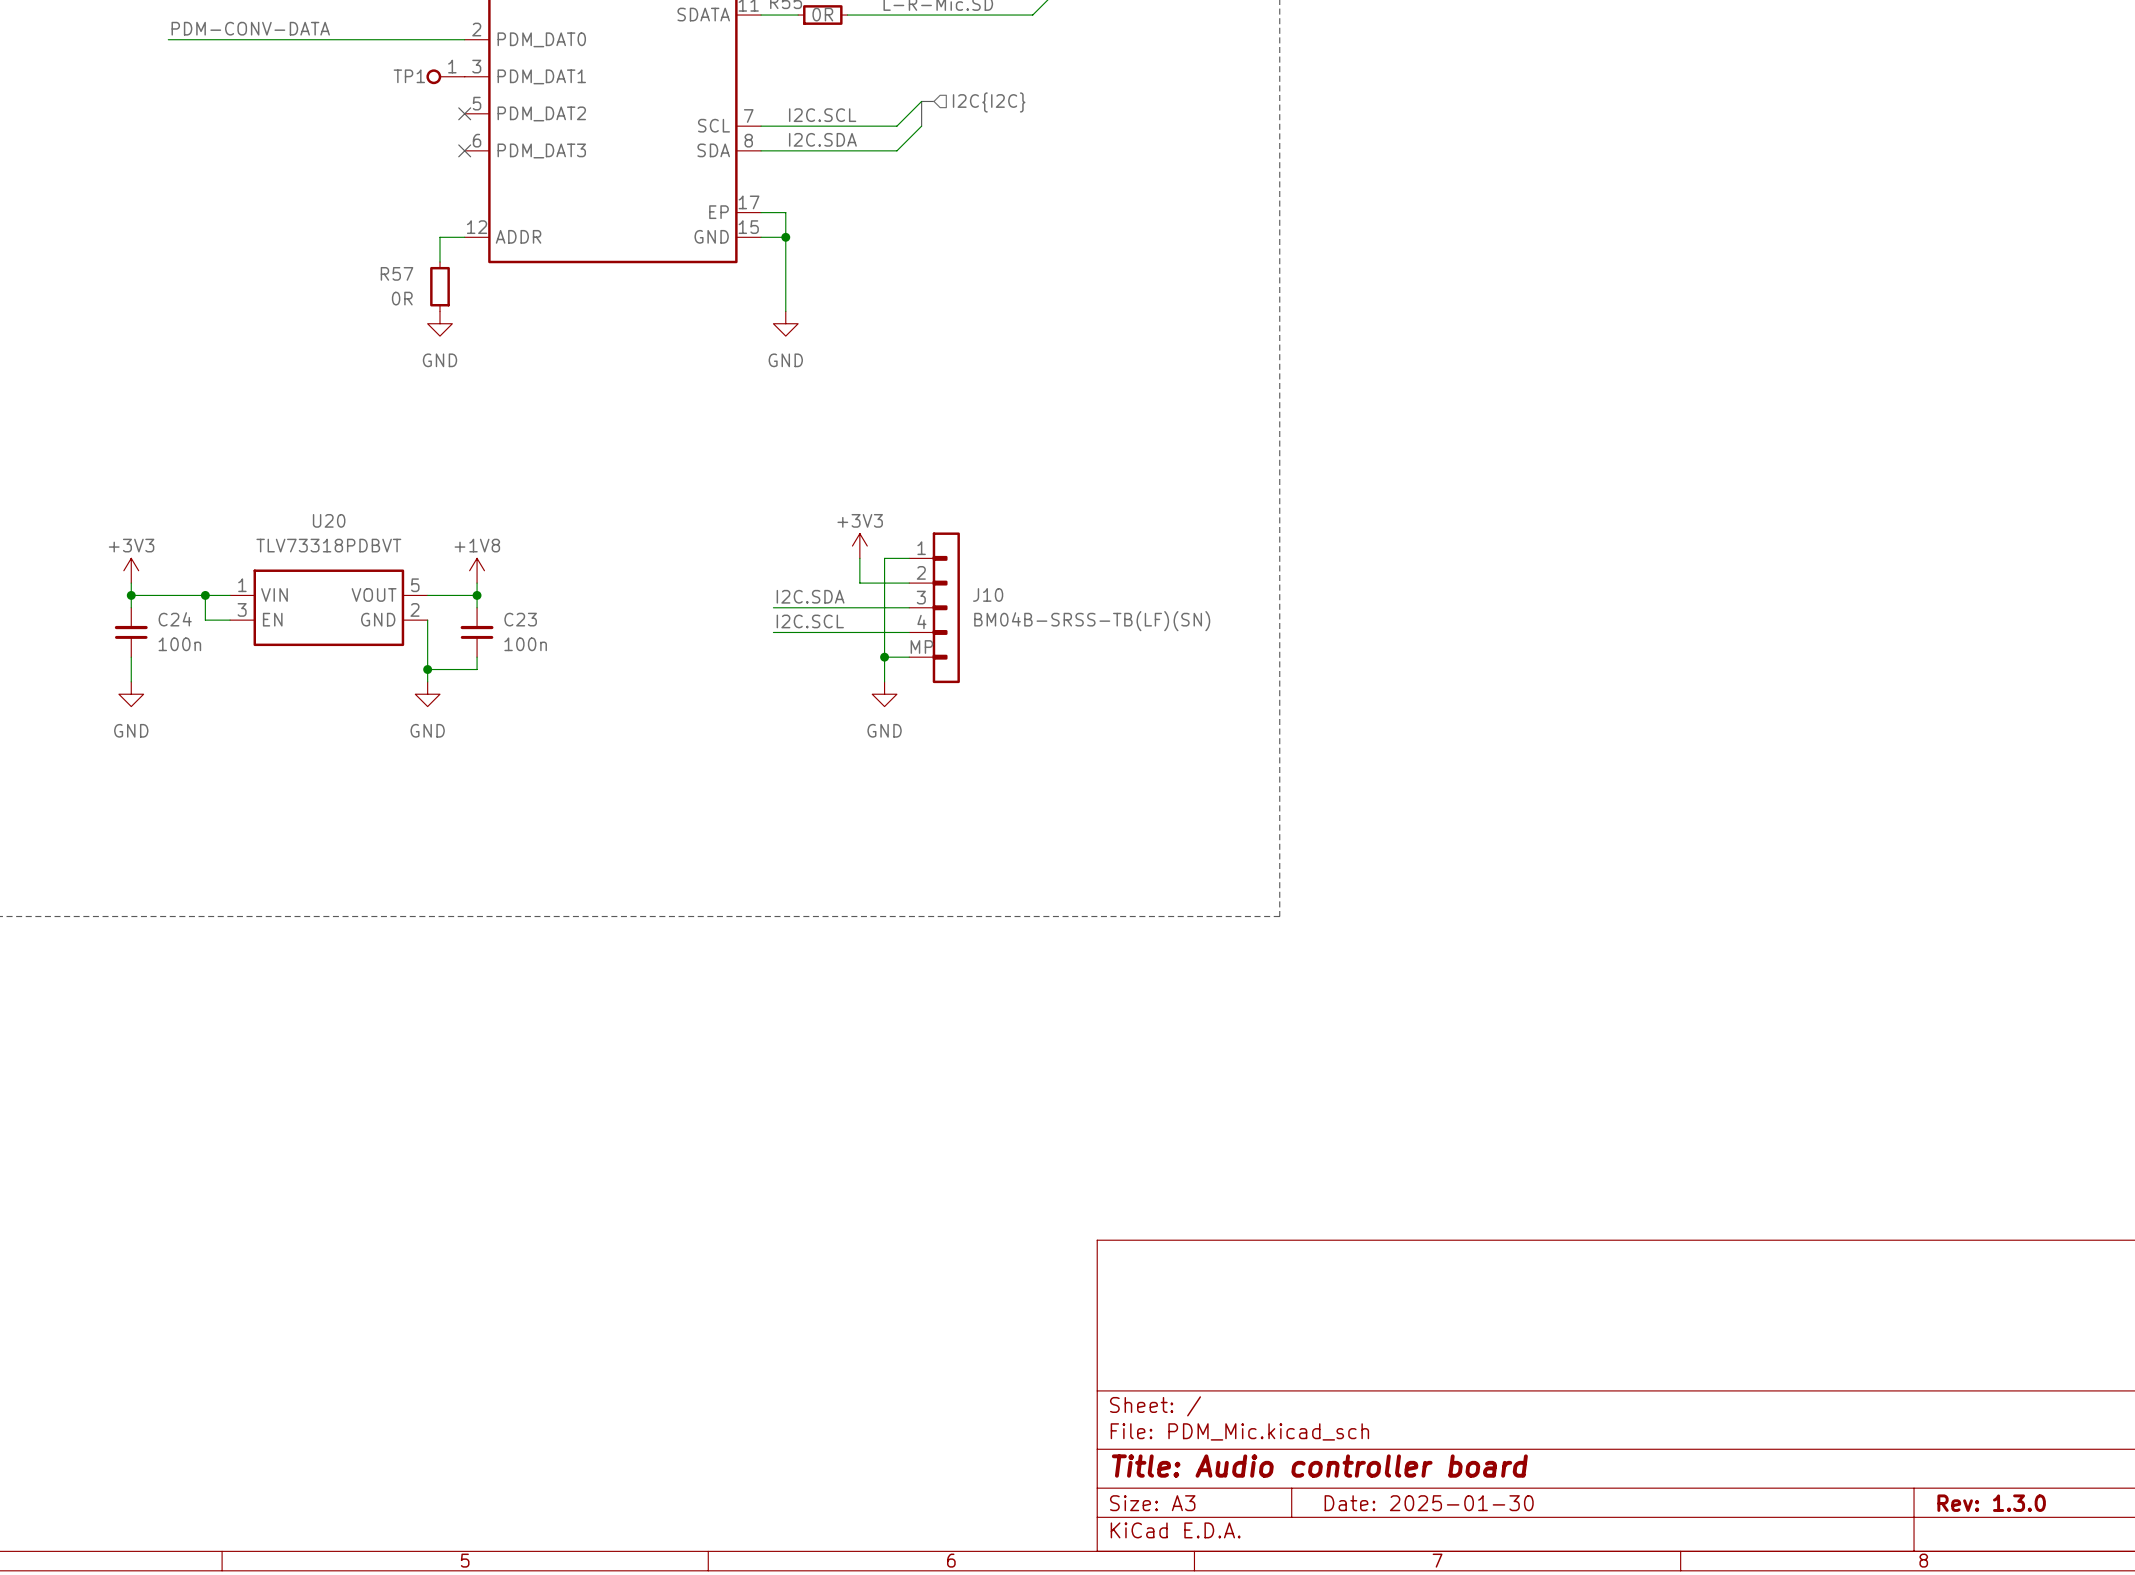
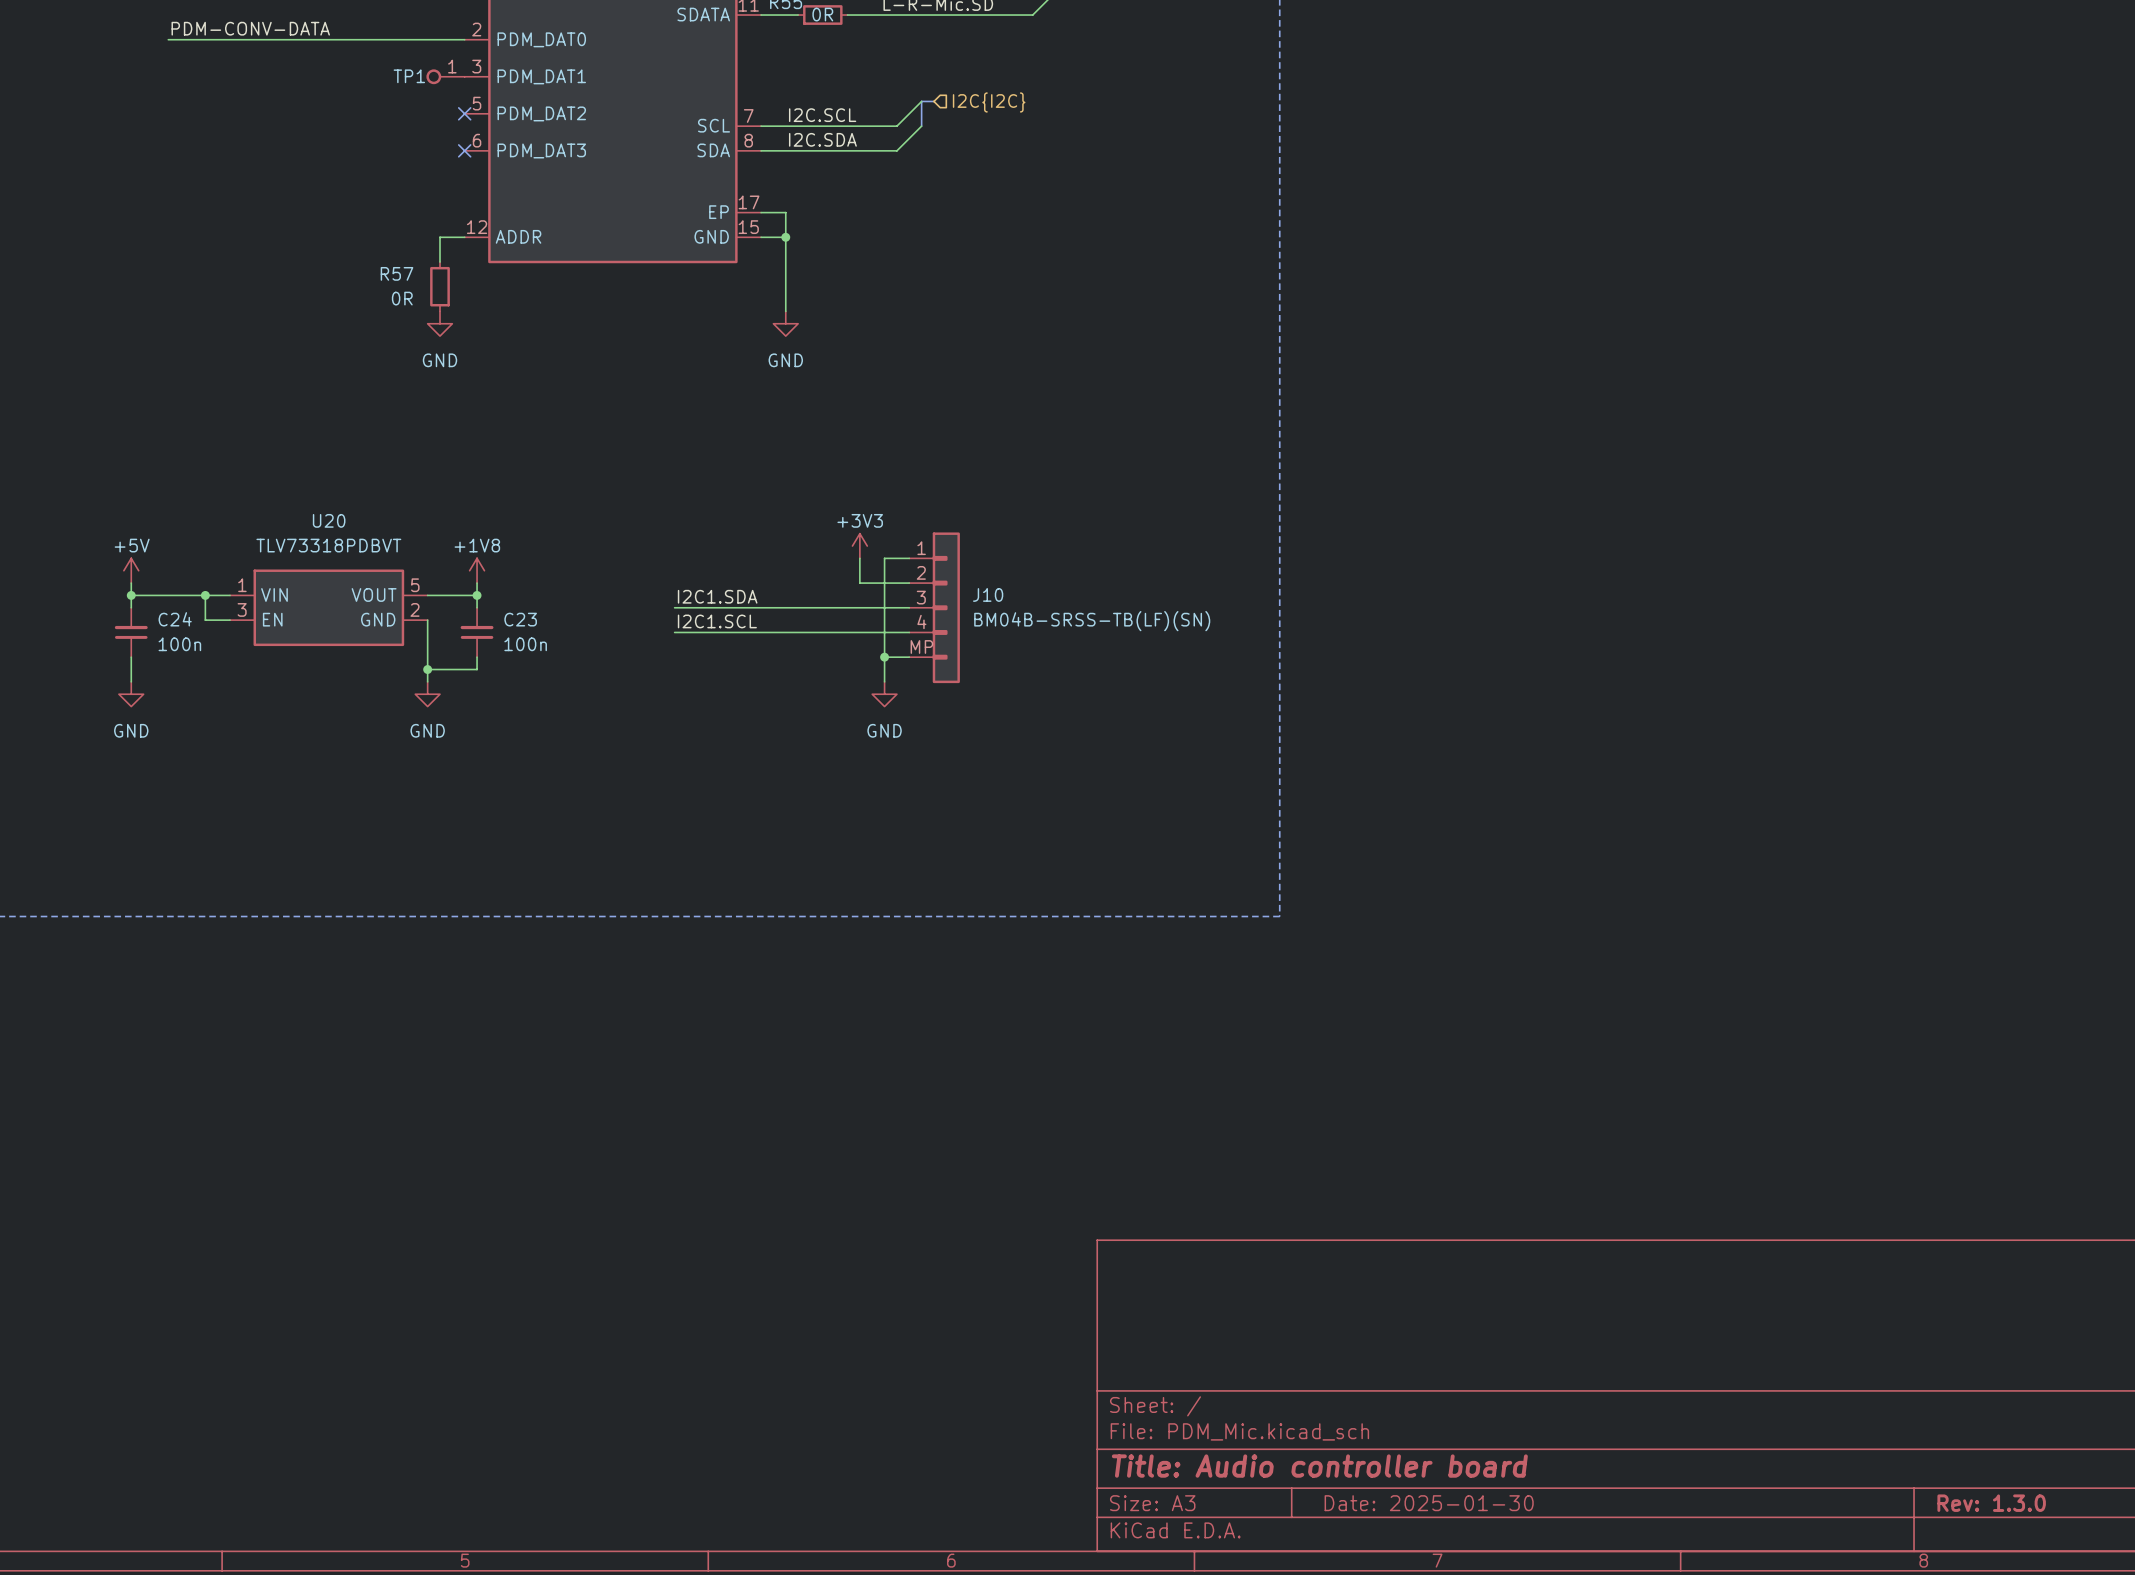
power symbol: +3V3 (131, 570) -> +5V (131, 570)
label: none -> I2C1.SDA (717, 596)
label: I2C.SDA (810, 596) -> none
wire: none -> (674, 607) (773, 607)
label: none -> I2C1.SCL (717, 621)
label: I2C.SCL (810, 621) -> none
wire: none -> (674, 632) (773, 632)

